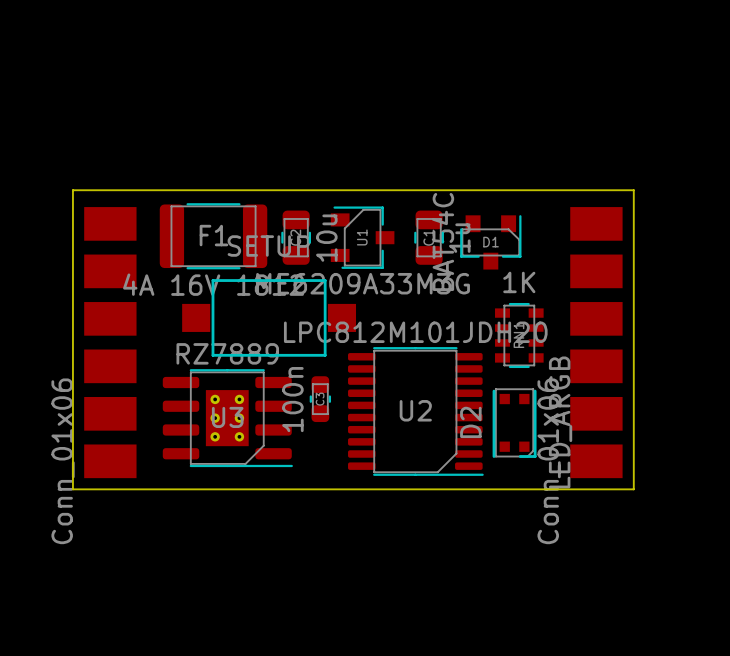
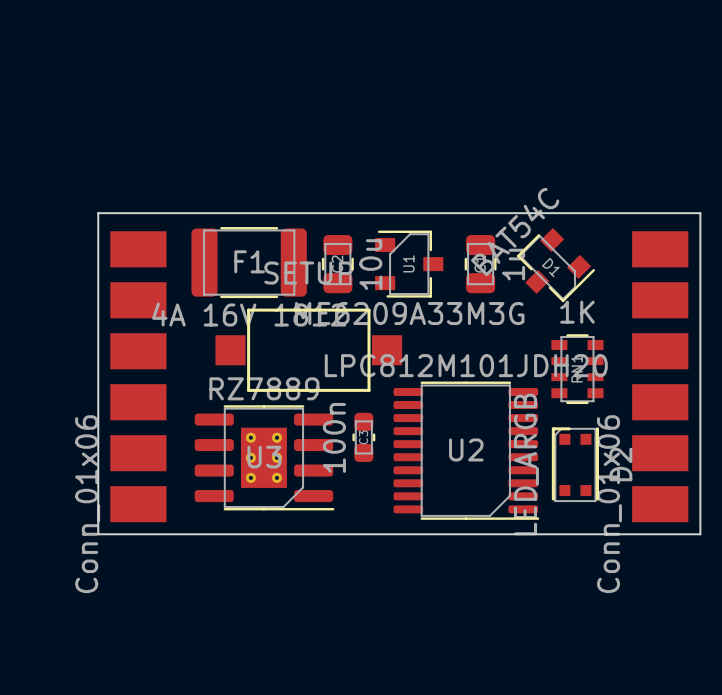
D1 rotation: 0° (490, 242) -> 45° clockwise (556, 265)
D2 rotation: 0° (514, 423) -> 180° (575, 464)

